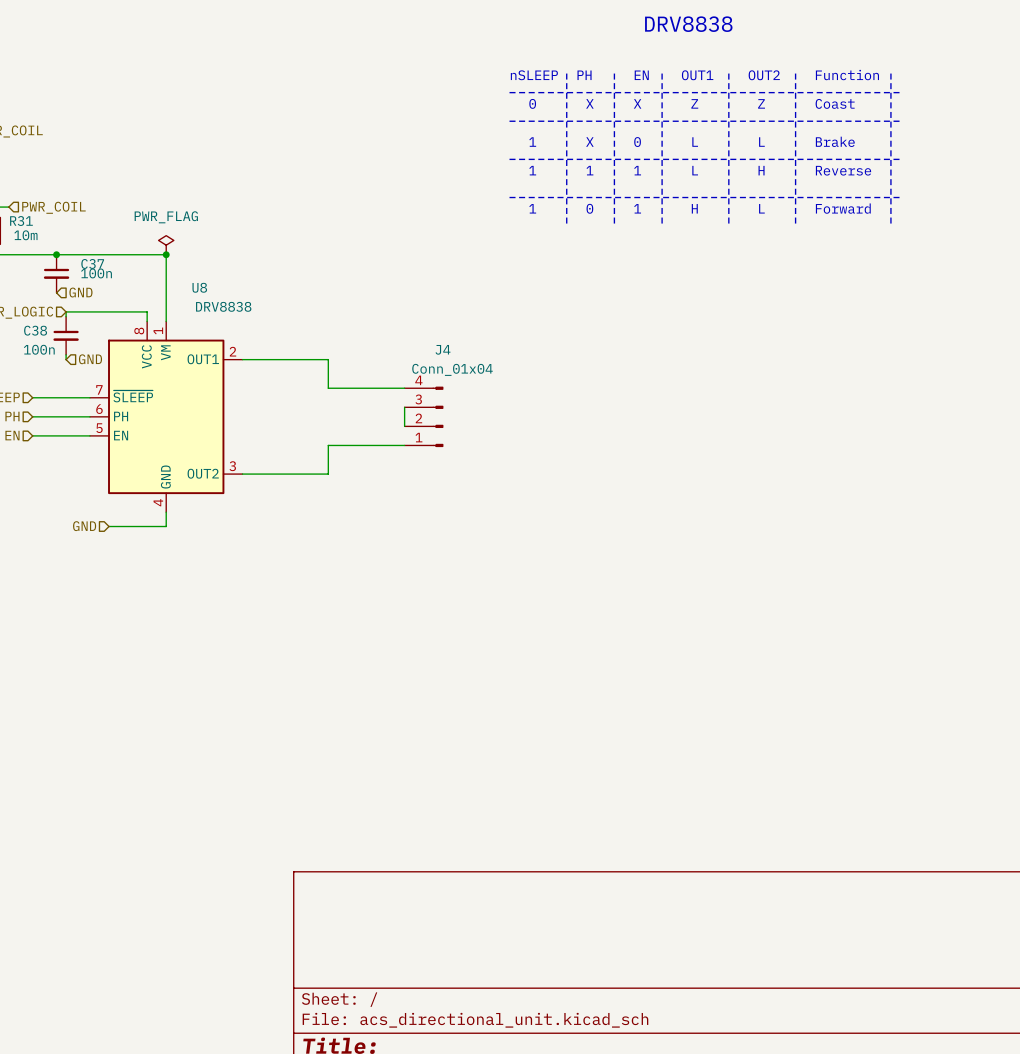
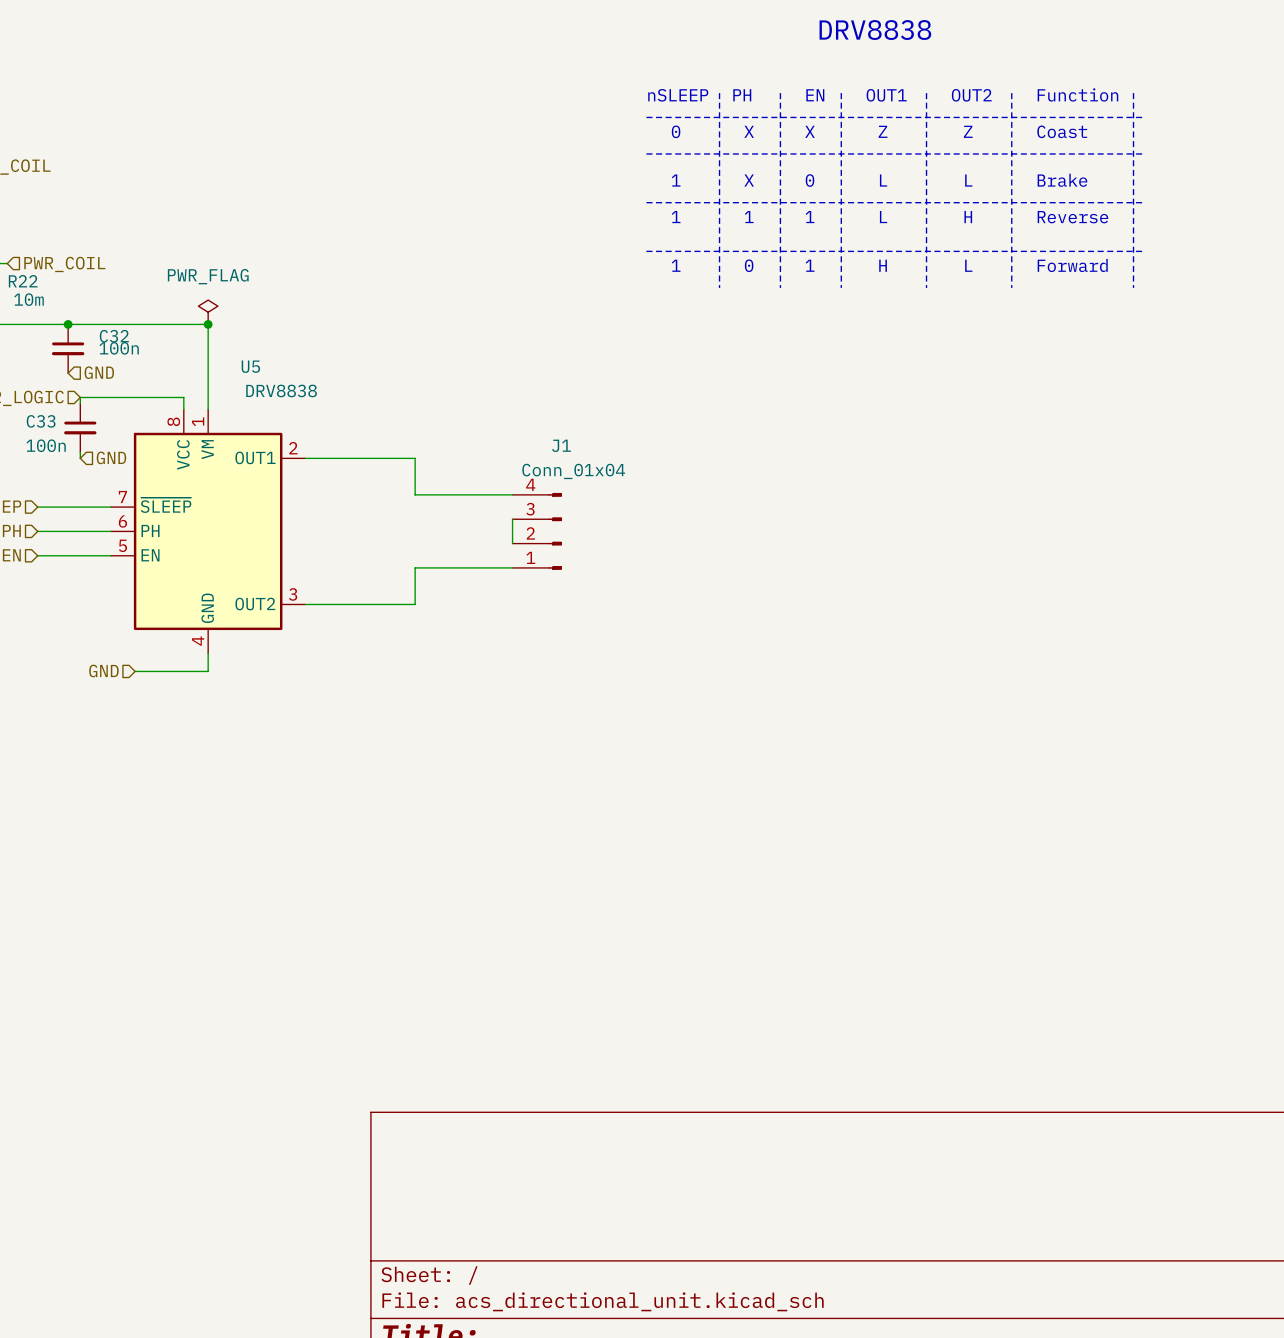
R31 name: R31 (21, 221) -> R22 (23, 281)
C37 name: C37 (92, 263) -> C32 (114, 336)
U8 name: U8 (199, 287) -> U5 (250, 366)
C38 name: C38 (35, 330) -> C33 (41, 421)
J4 name: J4 (443, 349) -> J1 (561, 445)

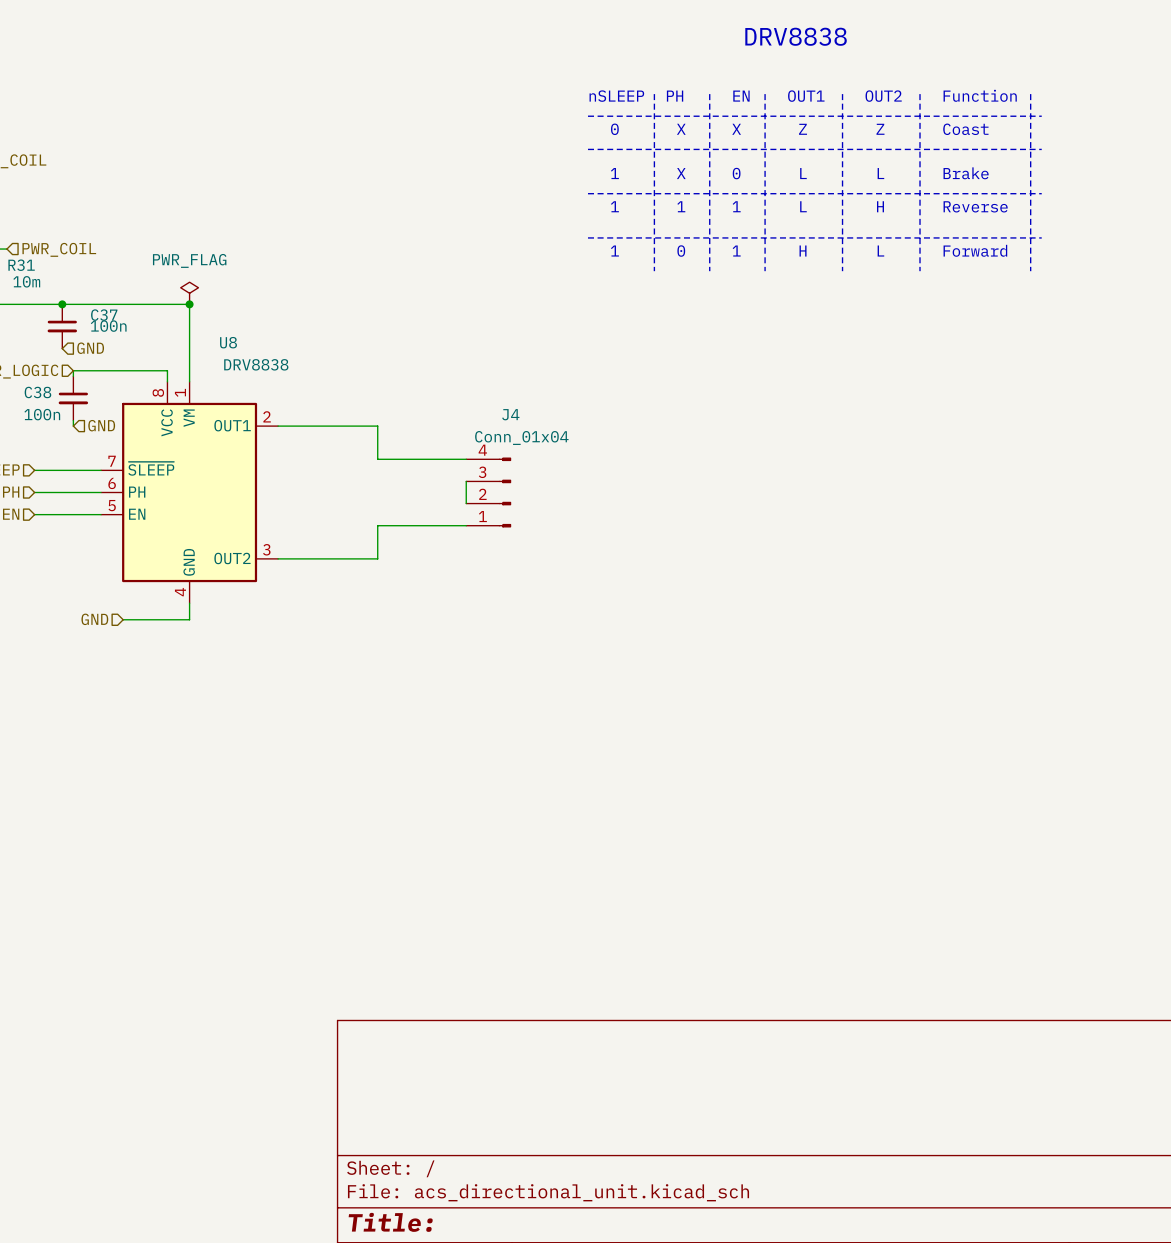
R22 name: R22 (23, 281) -> R31 (21, 265)
C32 name: C32 (114, 336) -> C37 (104, 315)
U5 name: U5 (250, 366) -> U8 (228, 342)
C33 name: C33 (41, 421) -> C38 (37, 392)
J1 name: J1 (561, 445) -> J4 (510, 414)

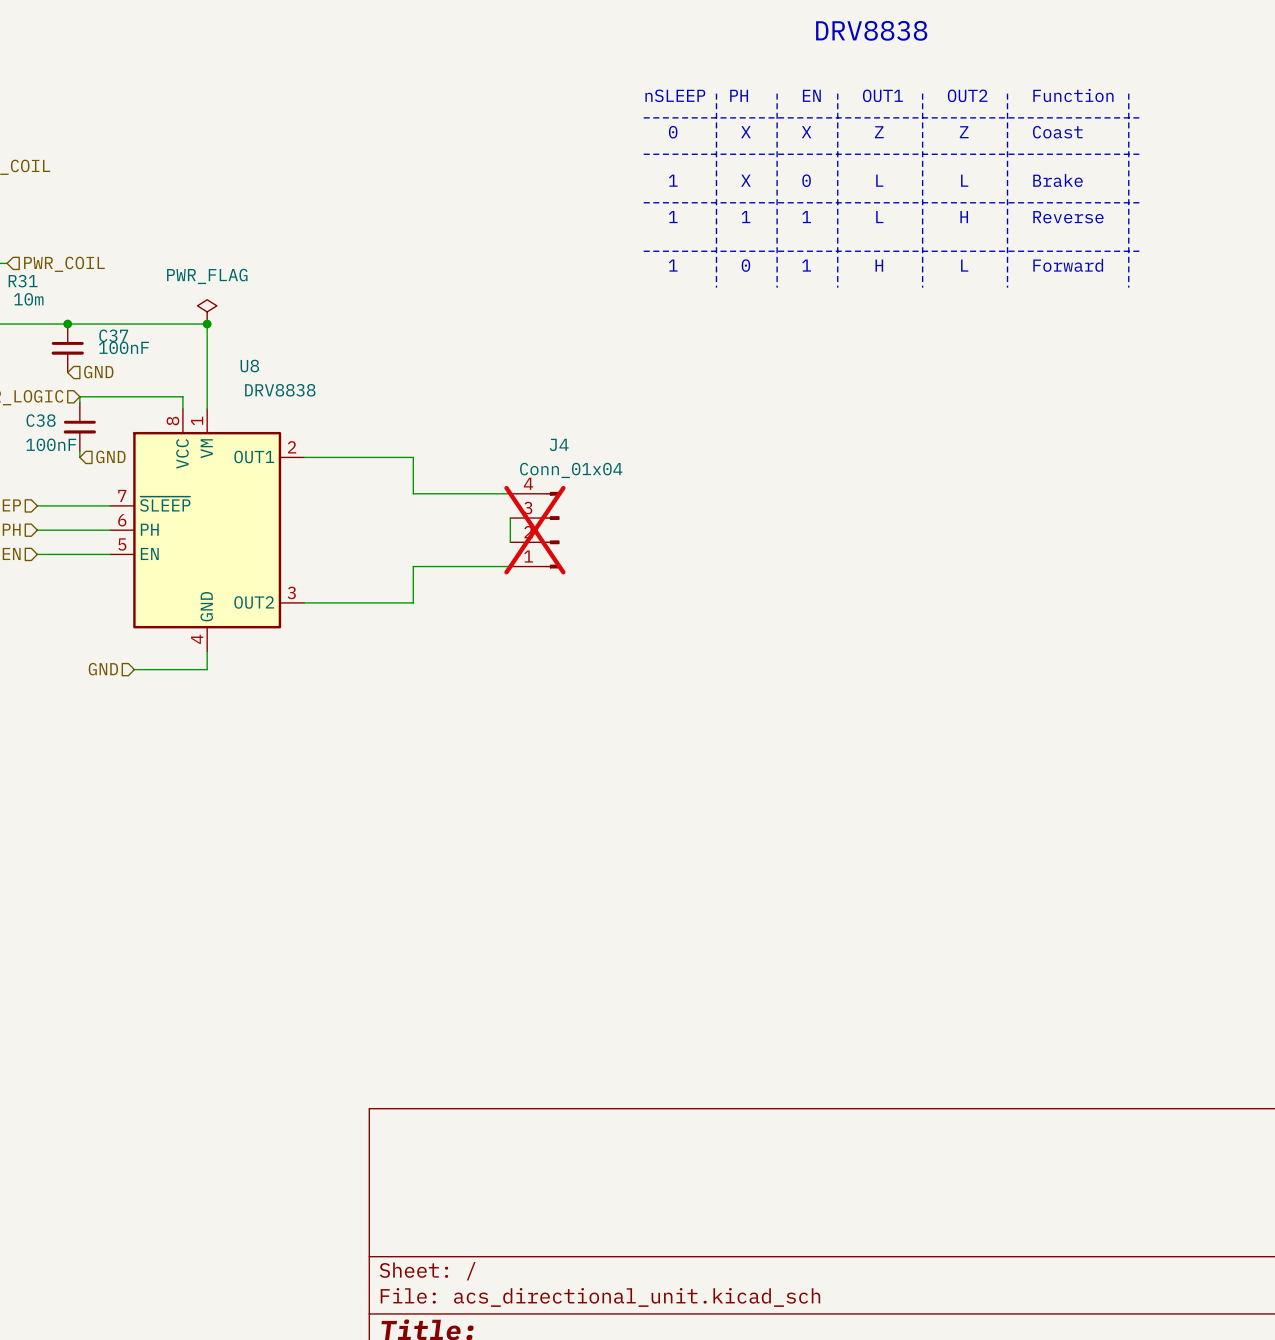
C37 value: 100n (108, 326) -> 100nF (123, 347)
C38 value: 100n (42, 414) -> 100nF (51, 444)
J4 do-not-place cross: none -> (534, 530)

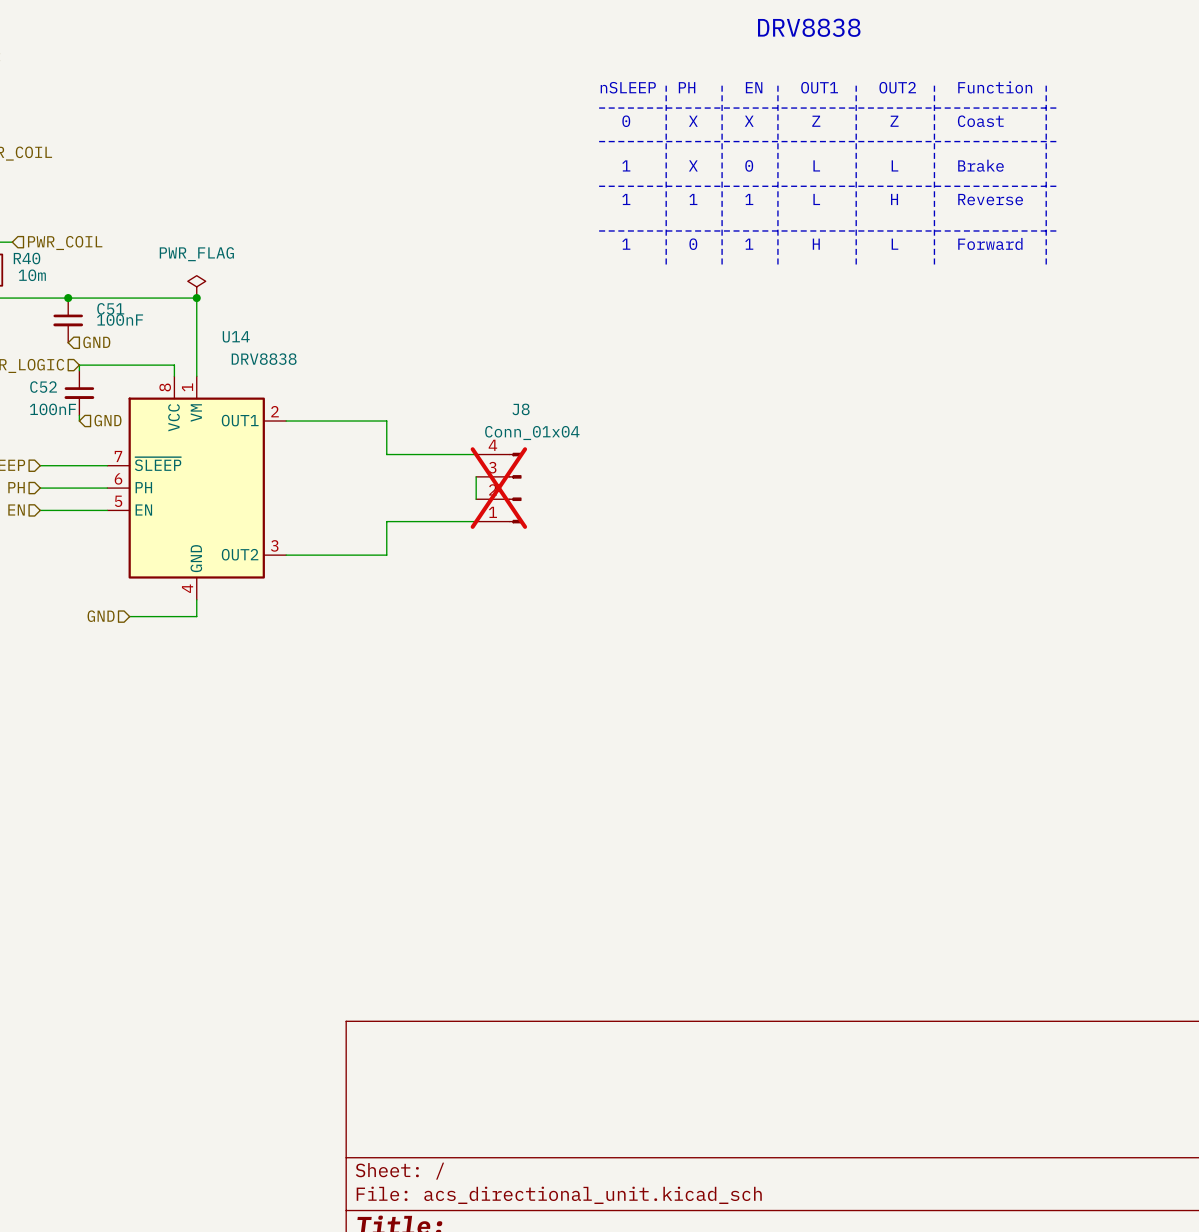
R31 name: R31 (23, 281) -> R40 (27, 258)
C37 name: C37 (113, 335) -> C51 (110, 308)
U8 name: U8 (249, 366) -> U14 (236, 336)
C38 name: C38 (41, 420) -> C52 (43, 387)
J4 name: J4 (559, 444) -> J8 (521, 409)

